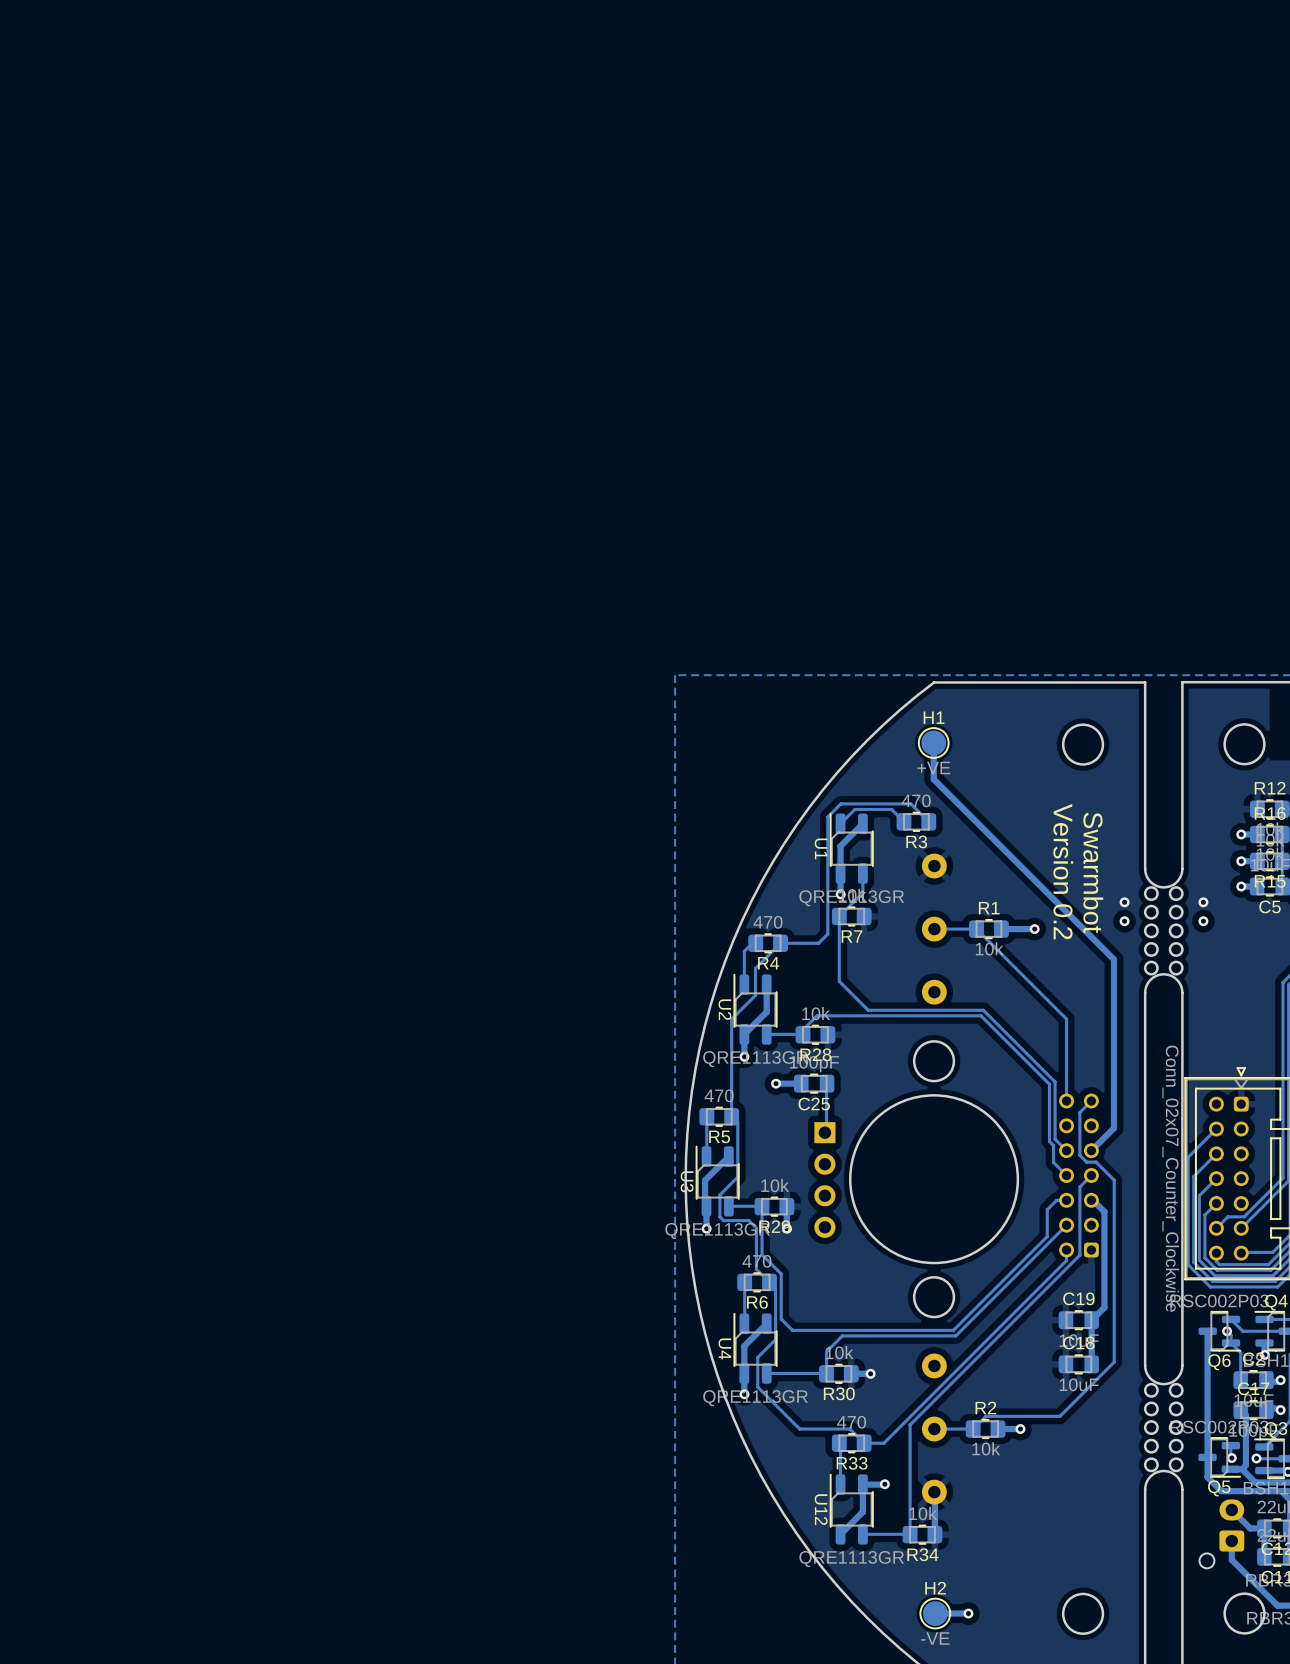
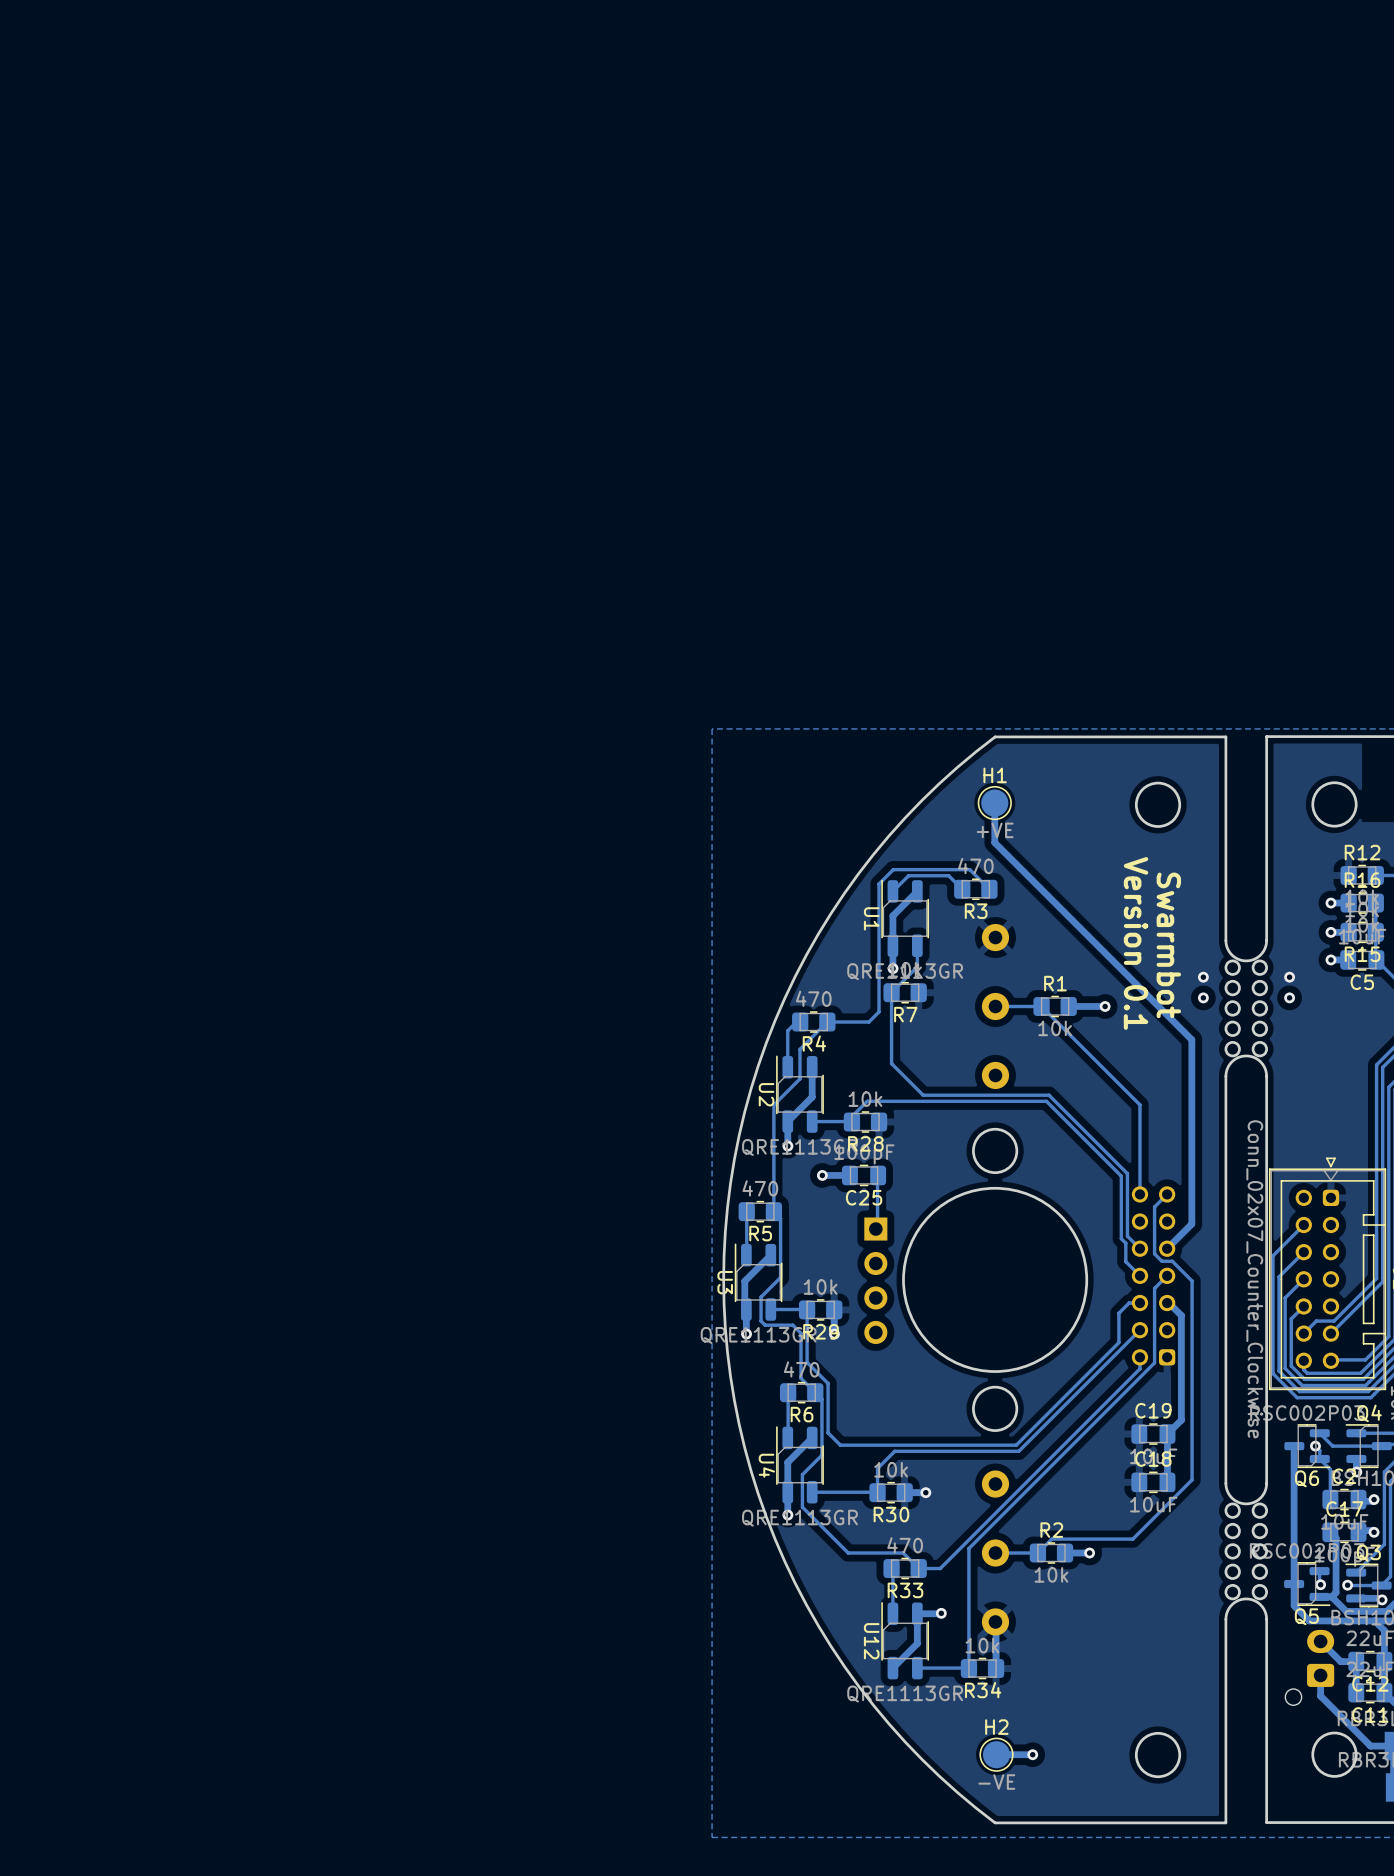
text: Version 0.2 (1063, 871) -> Version 0.1 (1136, 943)

